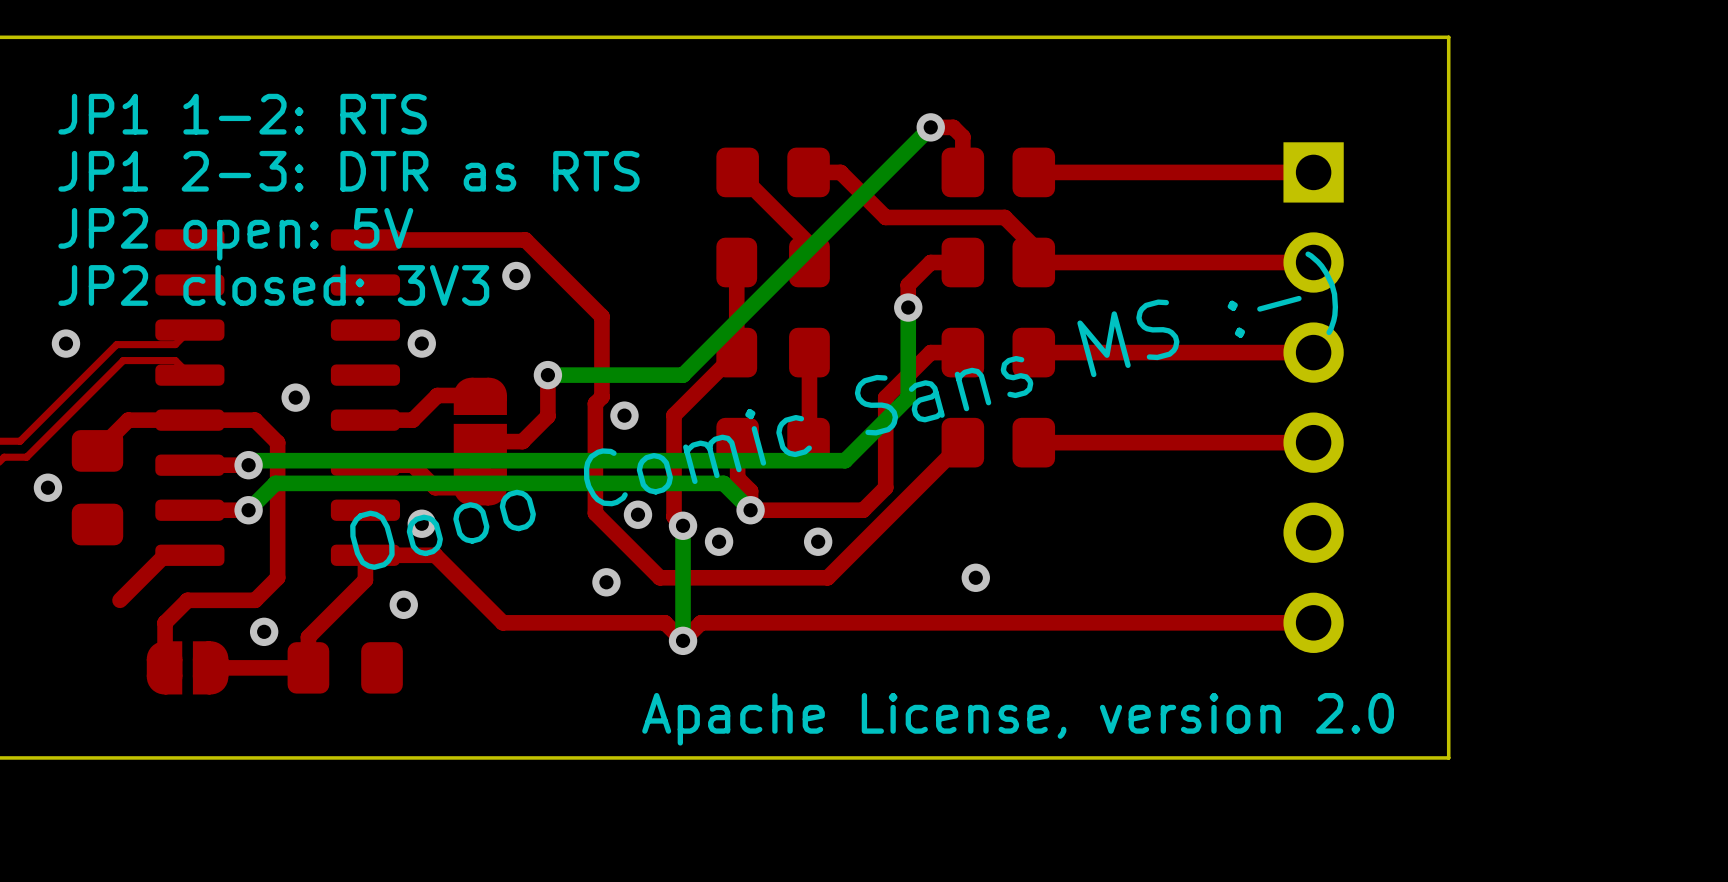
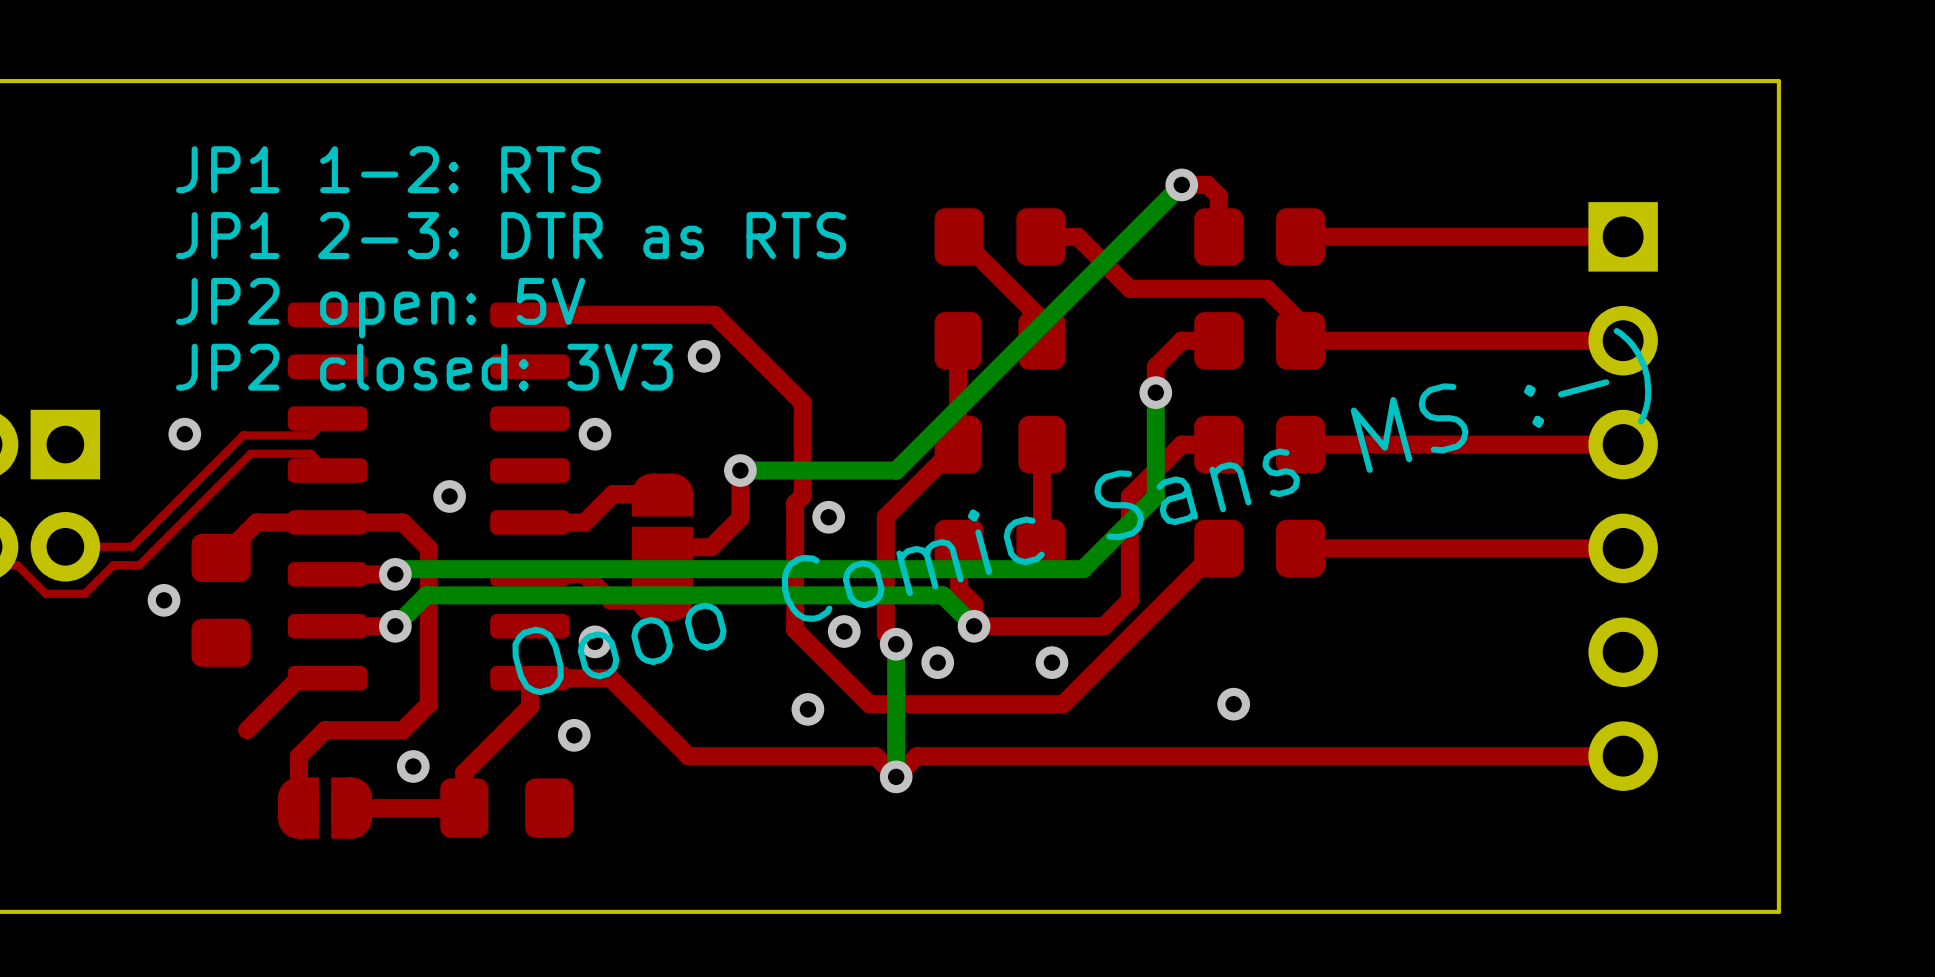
text: Apache License, version 2.0 (1018, 719) -> none

